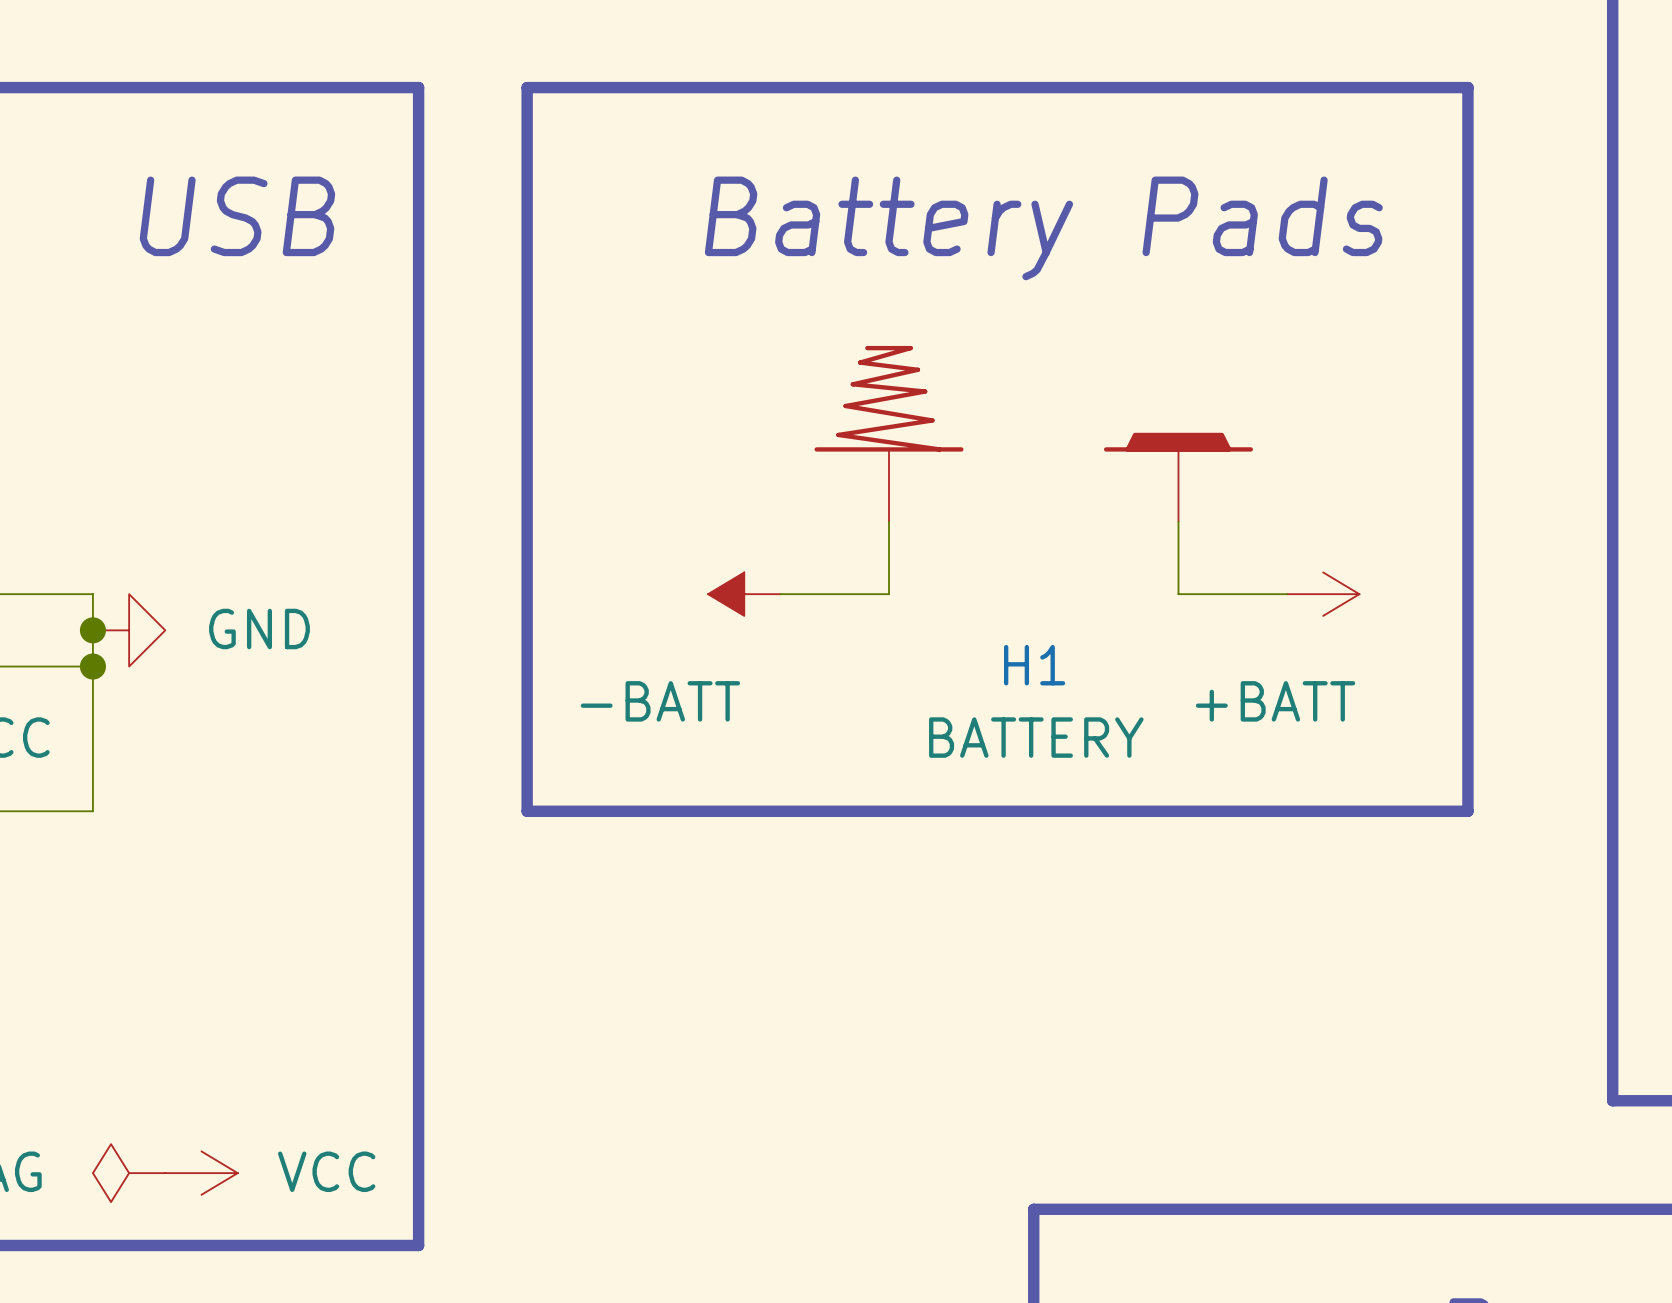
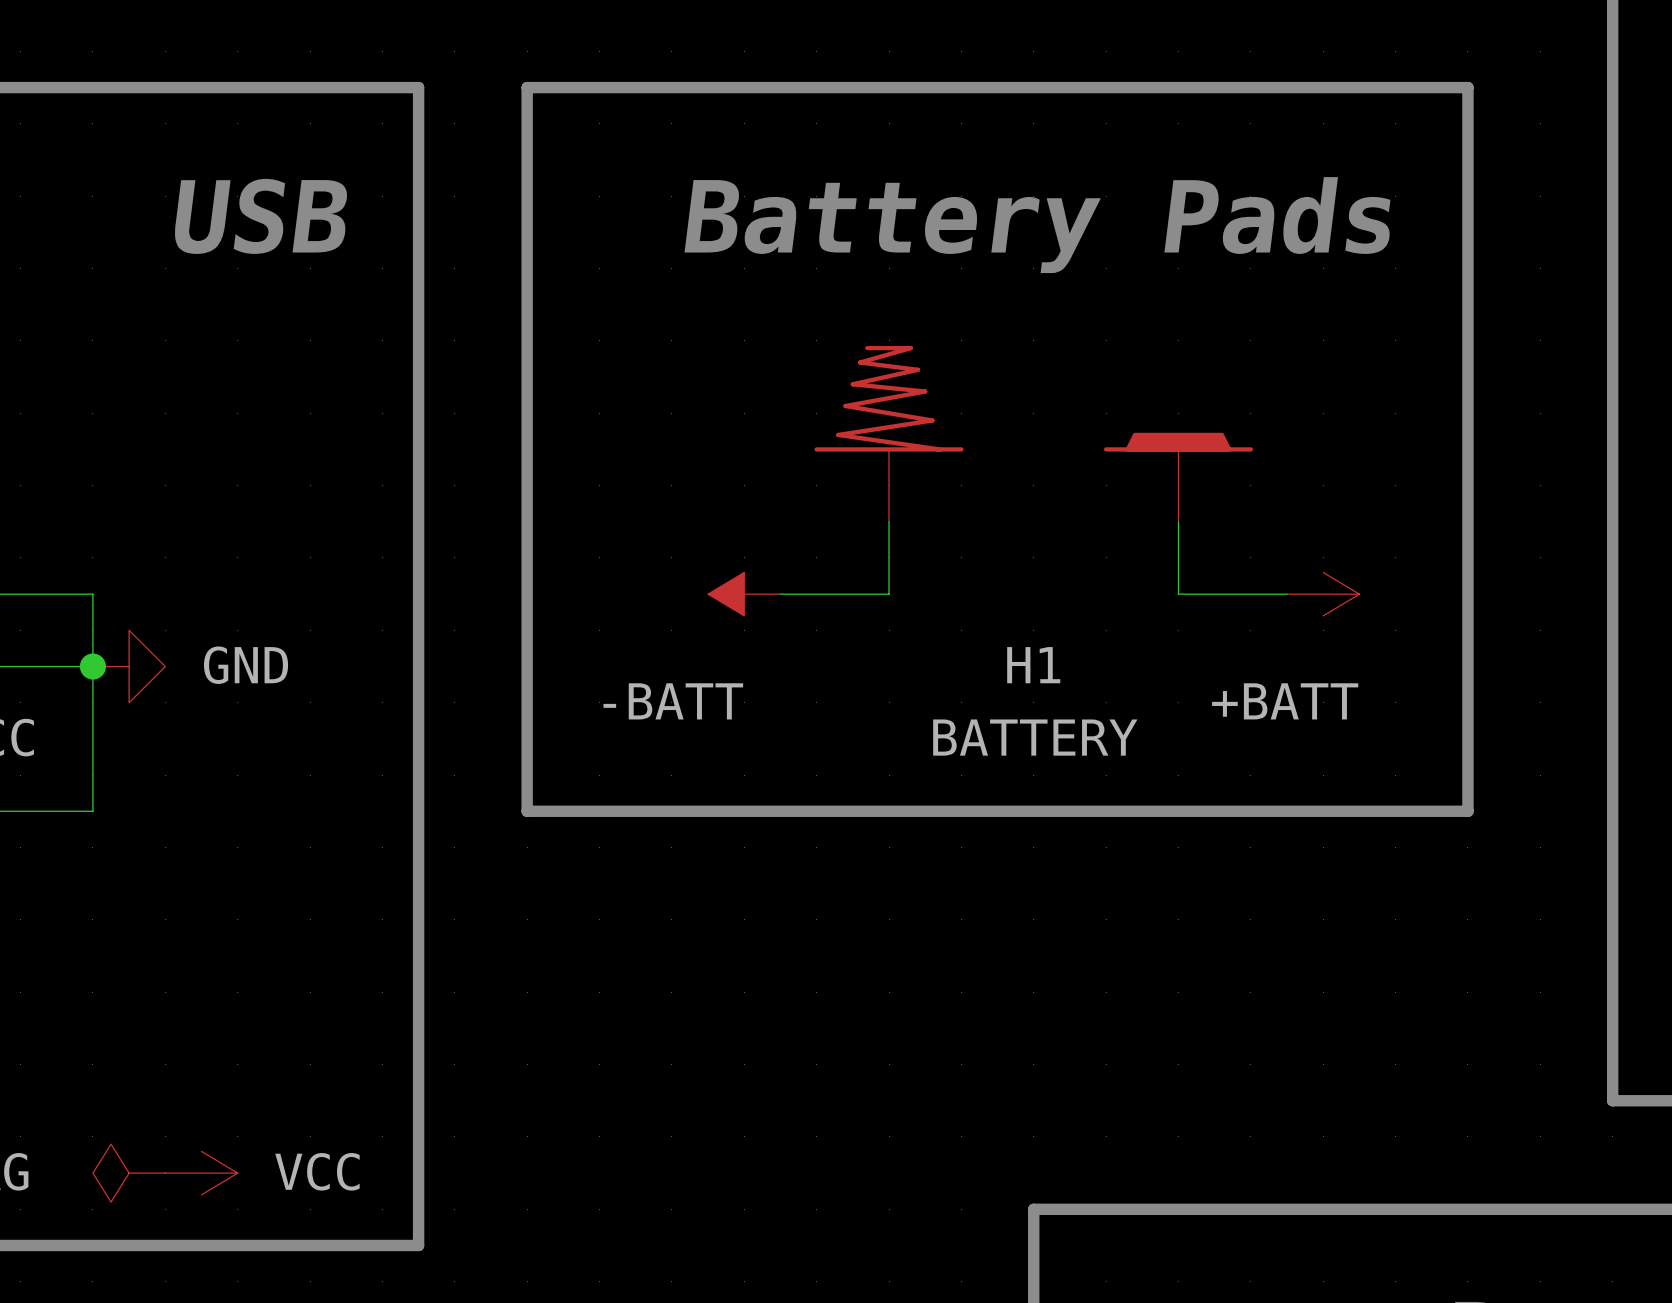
junction: (92, 630) -> none
power symbol position: GND (129, 630) -> GND (129, 666)

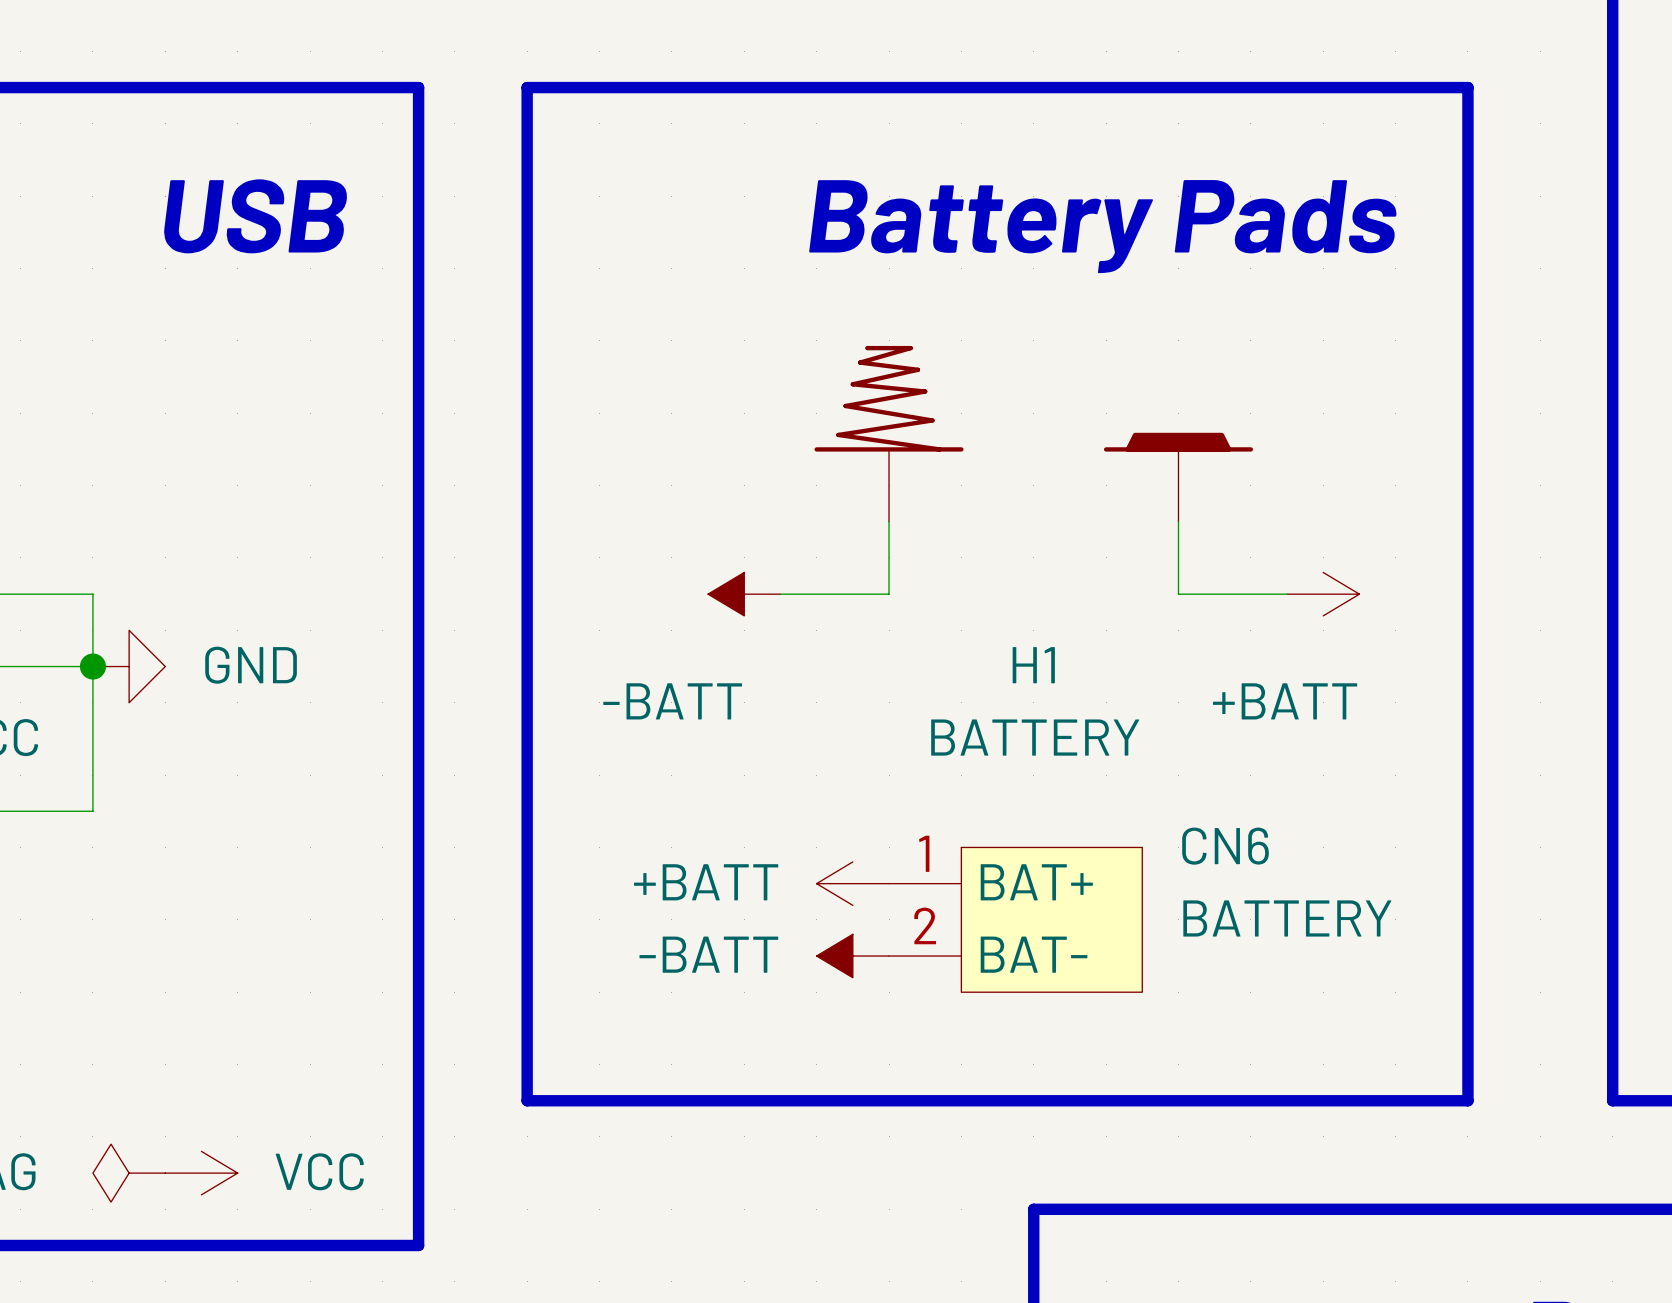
CN6: none -> BATTERY (1142, 702)
line: (527, 811) (1467, 811) -> (527, 811) (527, 1100) (1467, 1100) (1467, 811)
power symbol: none -> +BATT (852, 883)
power symbol: none -> -BATT (852, 956)

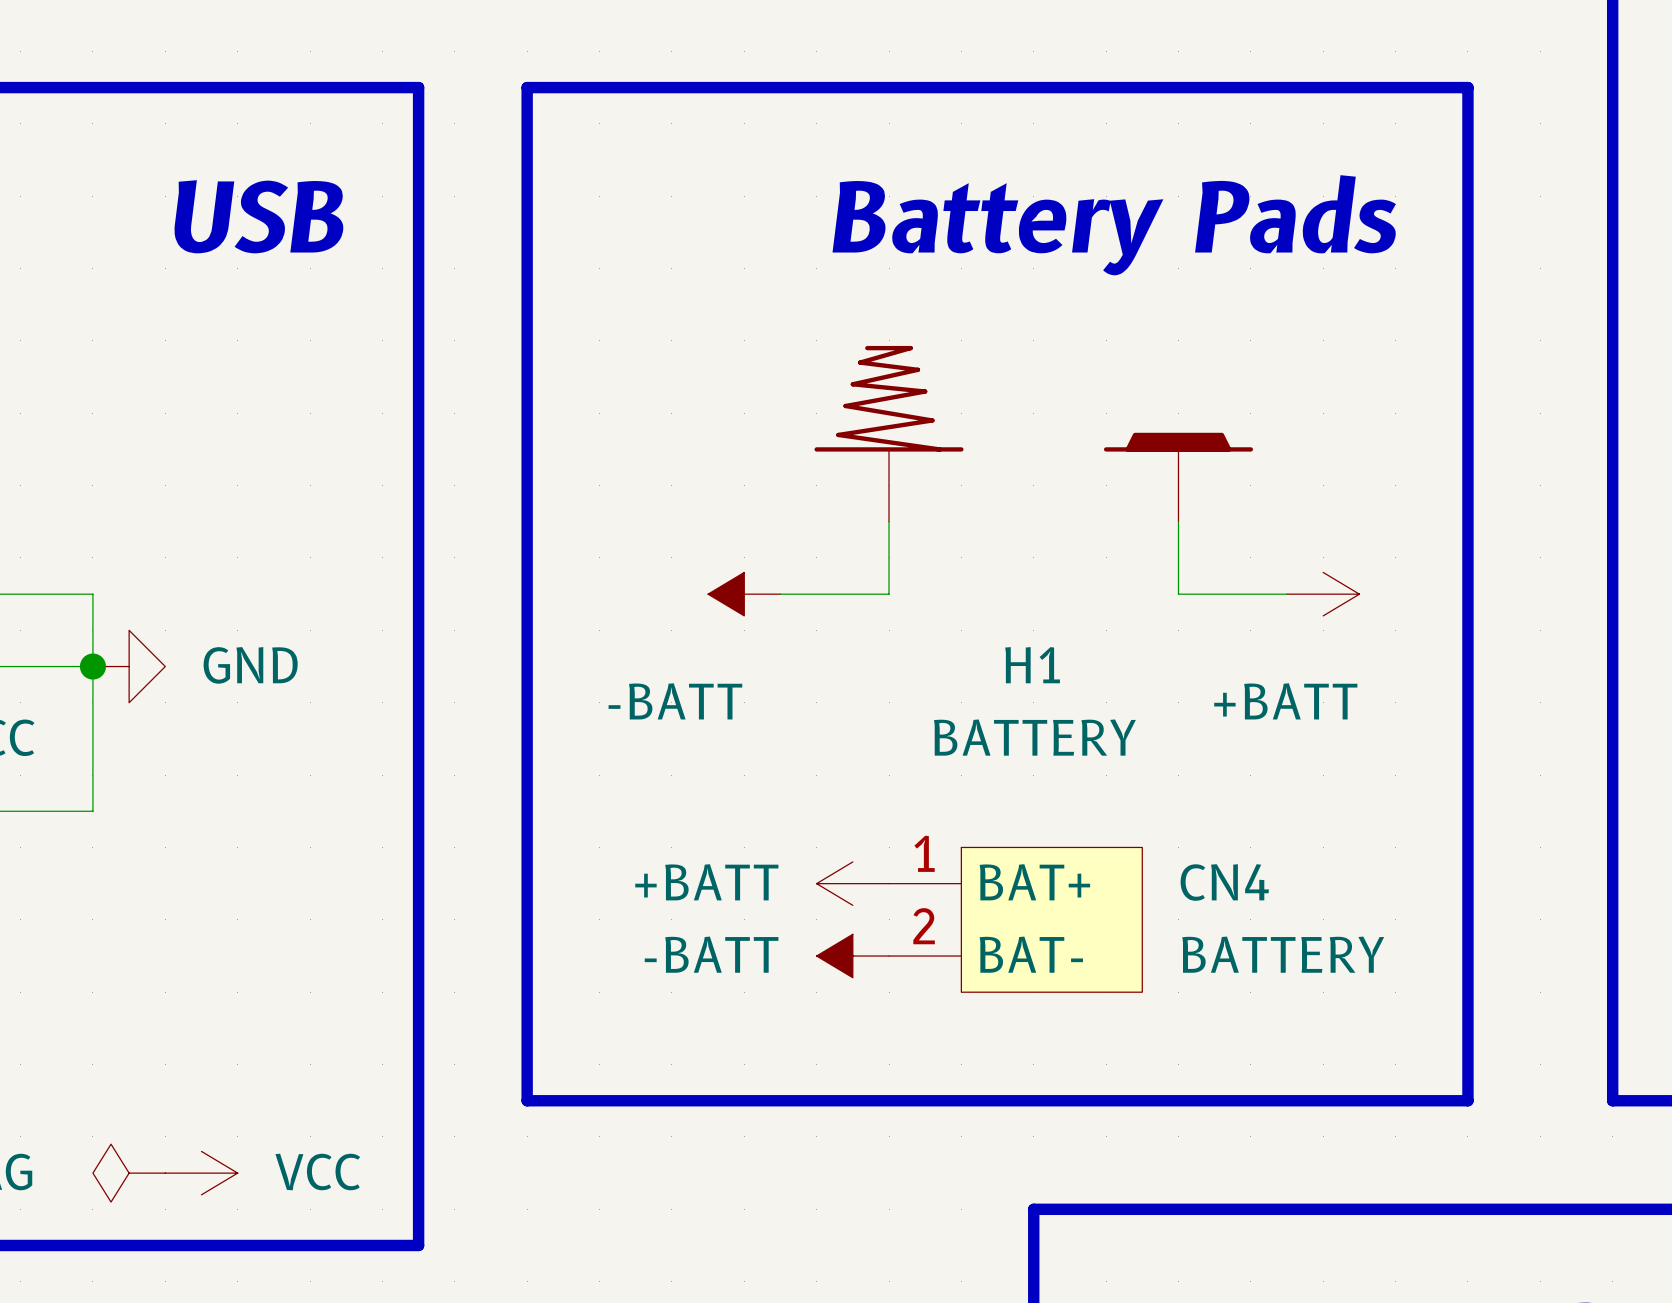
CN6 name: CN6 (1225, 846) -> CN4 (1224, 882)
CN6 value position: BATTERY (1287, 918) -> BATTERY (1283, 954)

